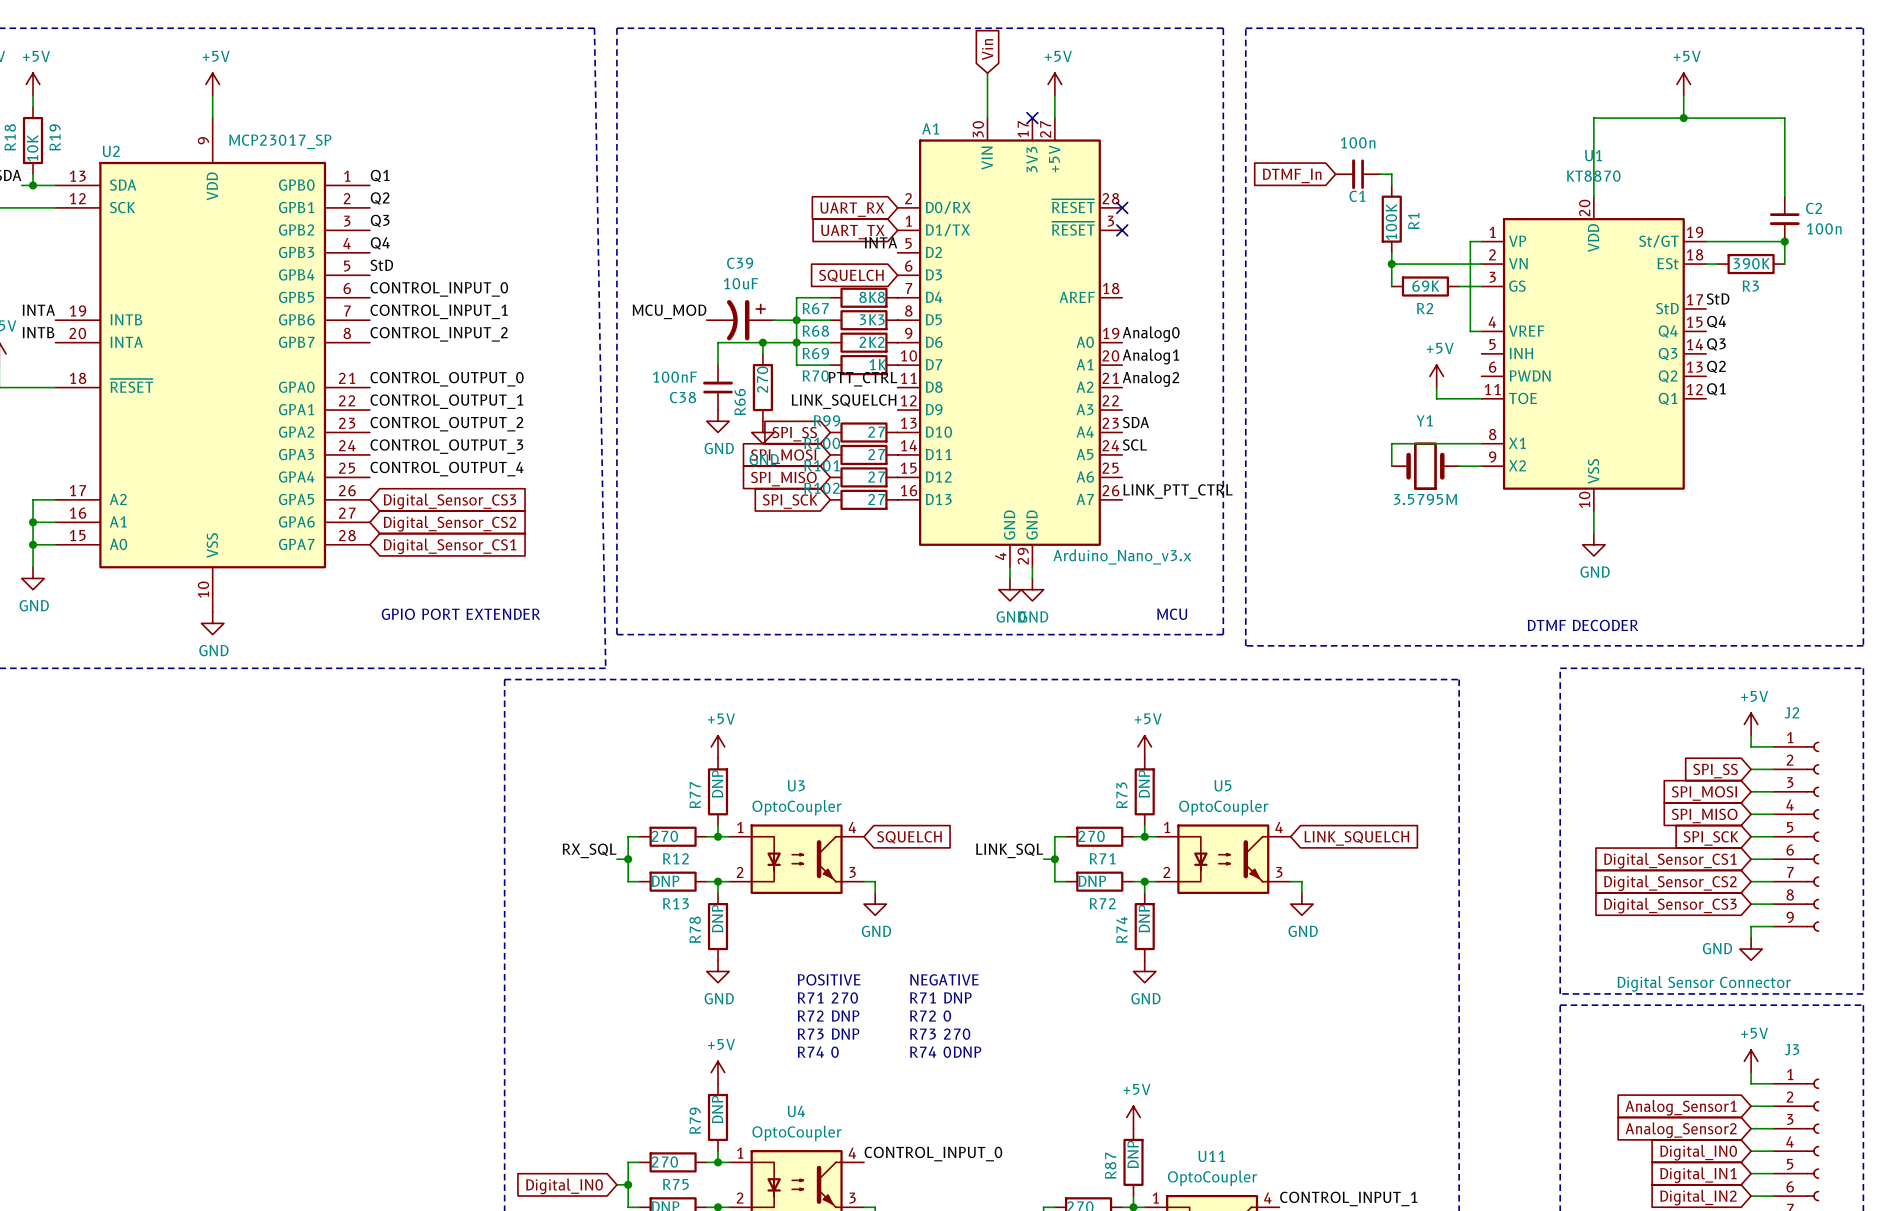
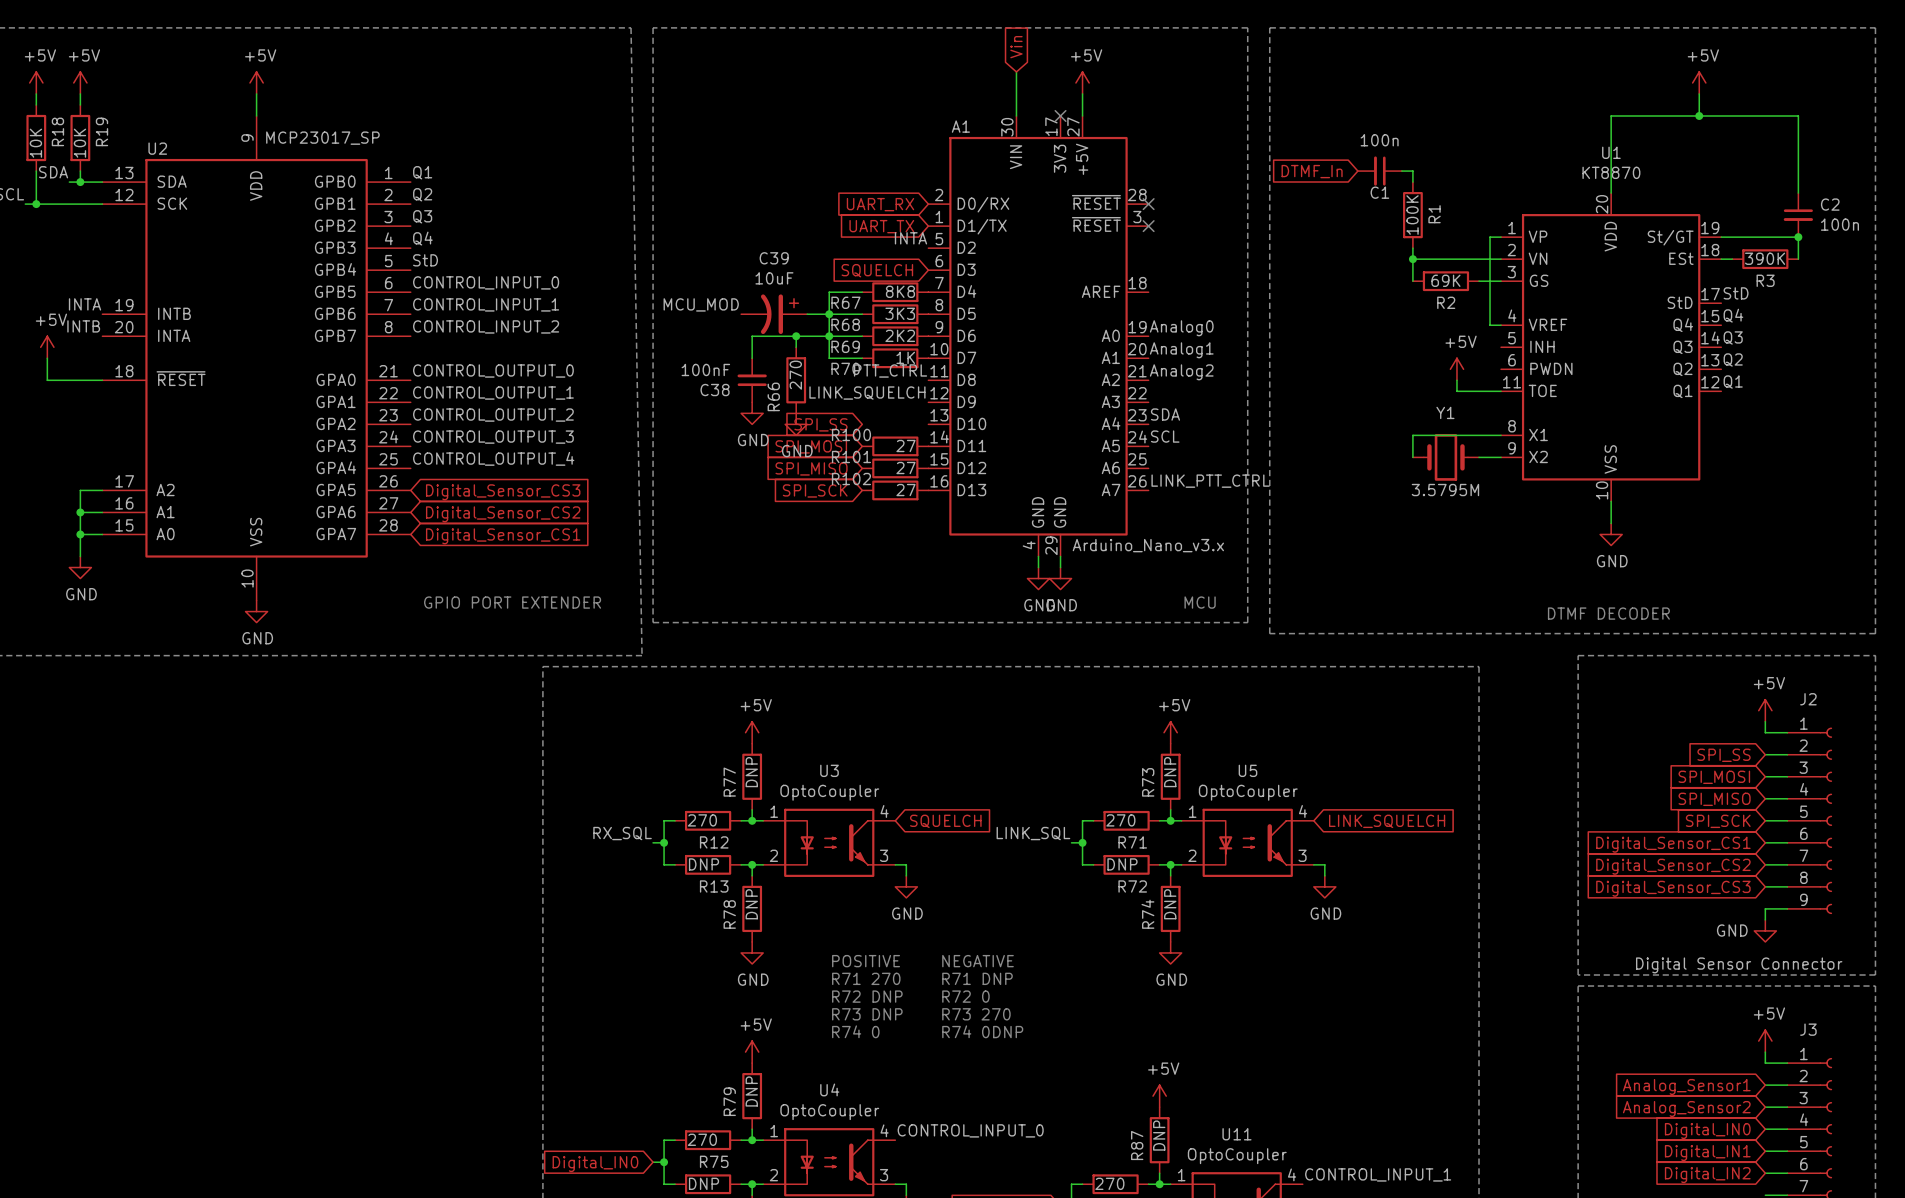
R99: 27 (863, 432) -> none

